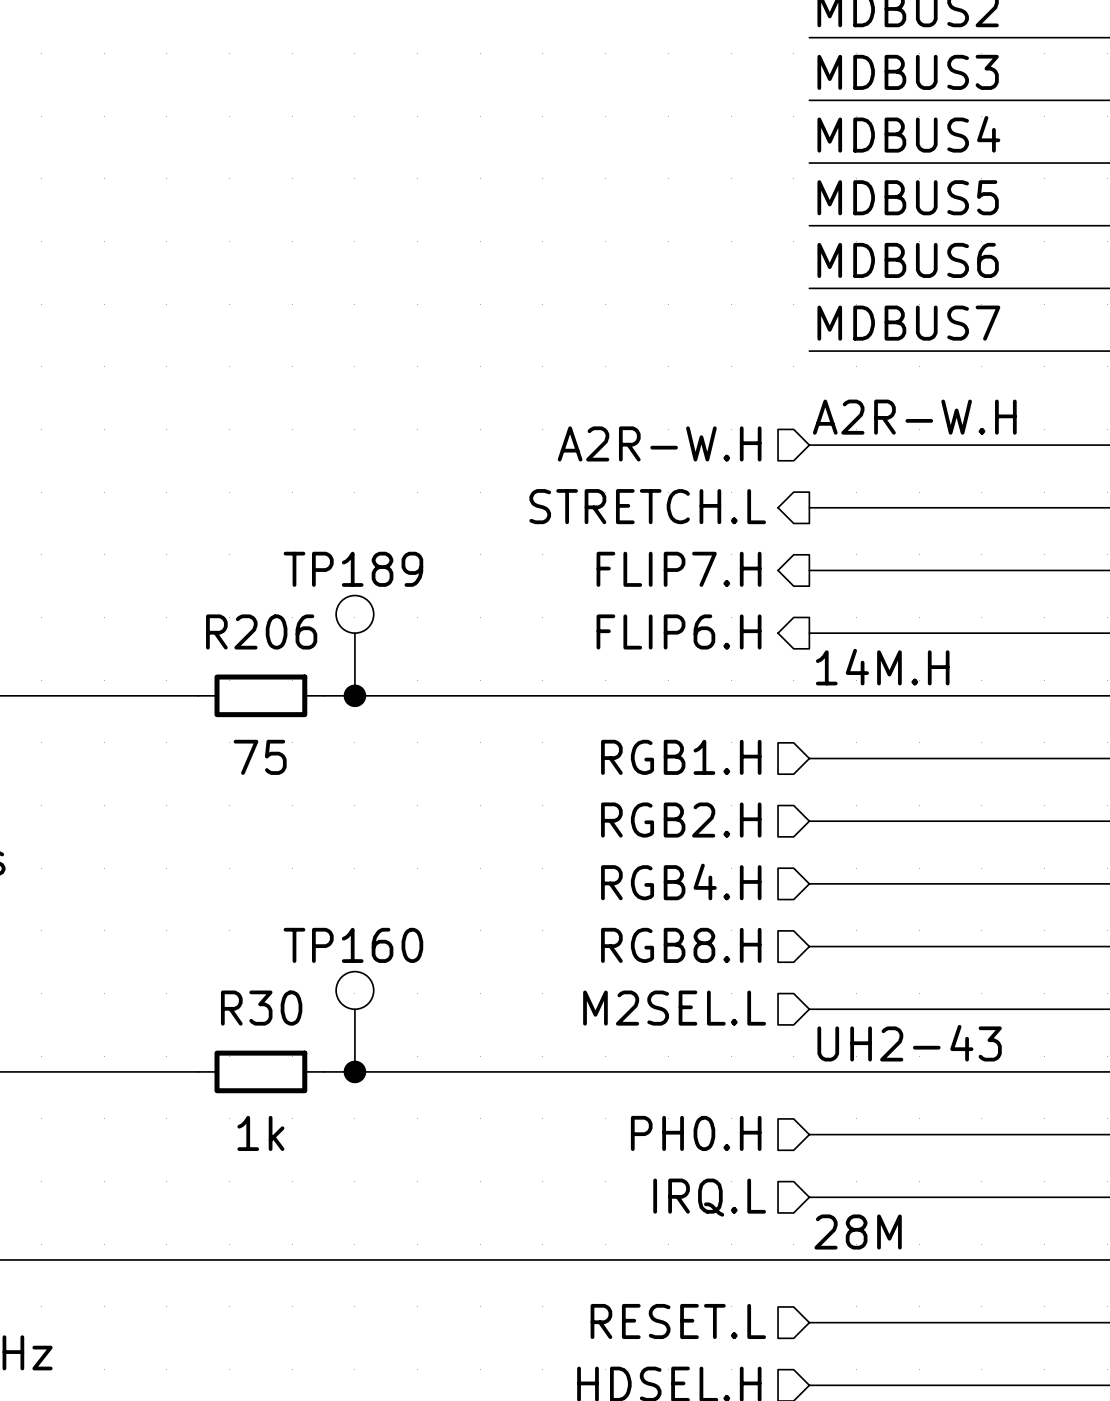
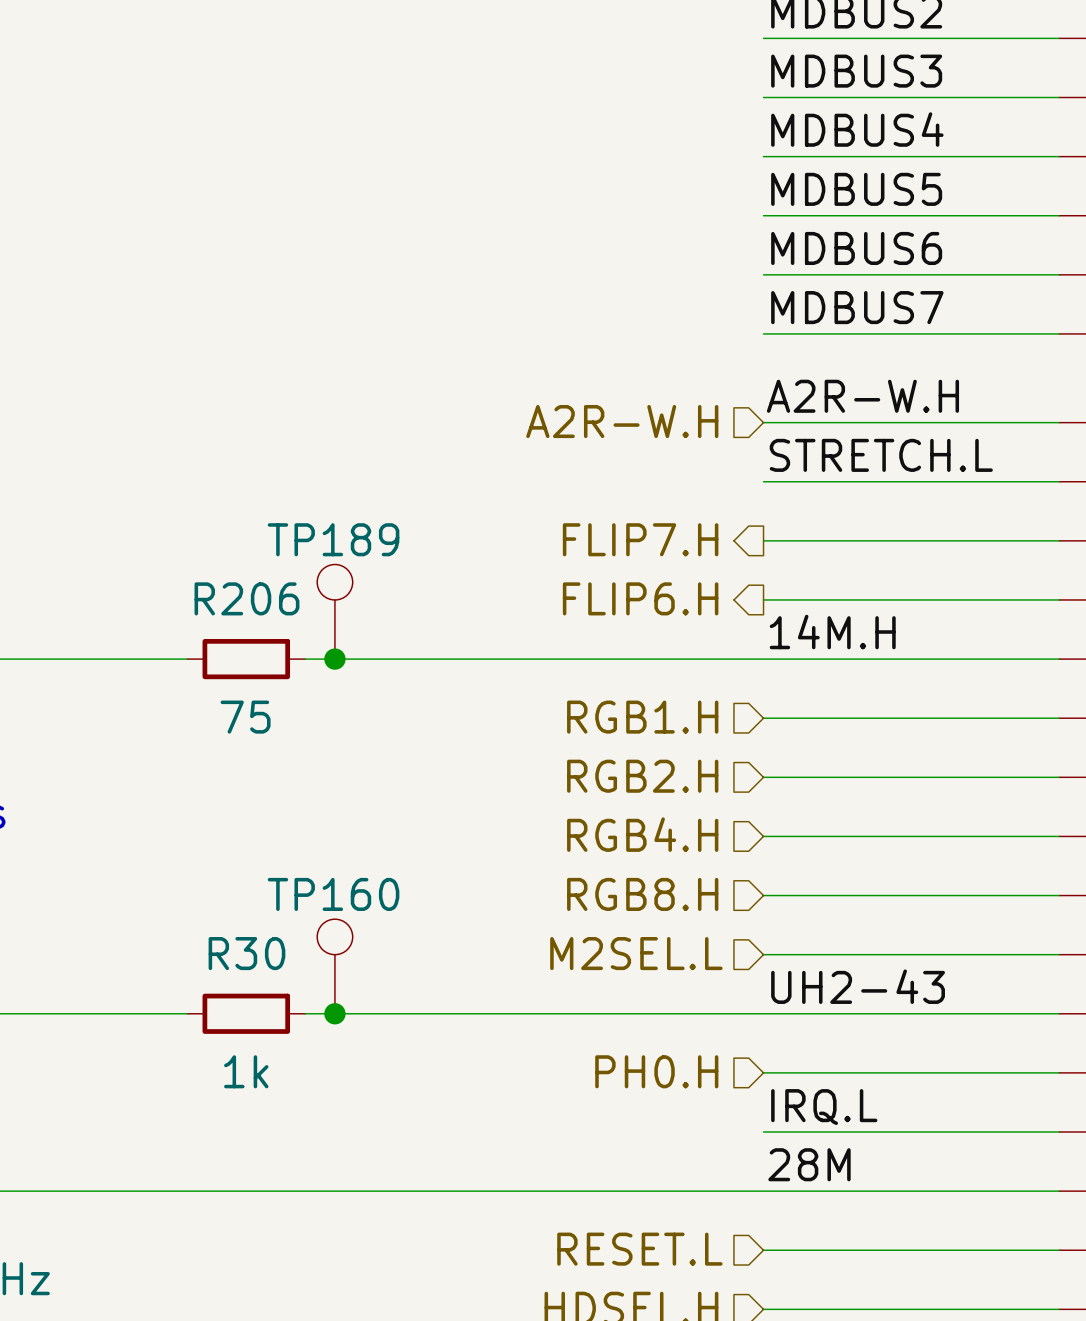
label: none -> STRETCH.L (881, 455)
hierarchical label: STRETCH.L (647, 506) -> none
label: none -> IRQ.L (824, 1107)
hierarchical label: IRQ.L (709, 1197) -> none

